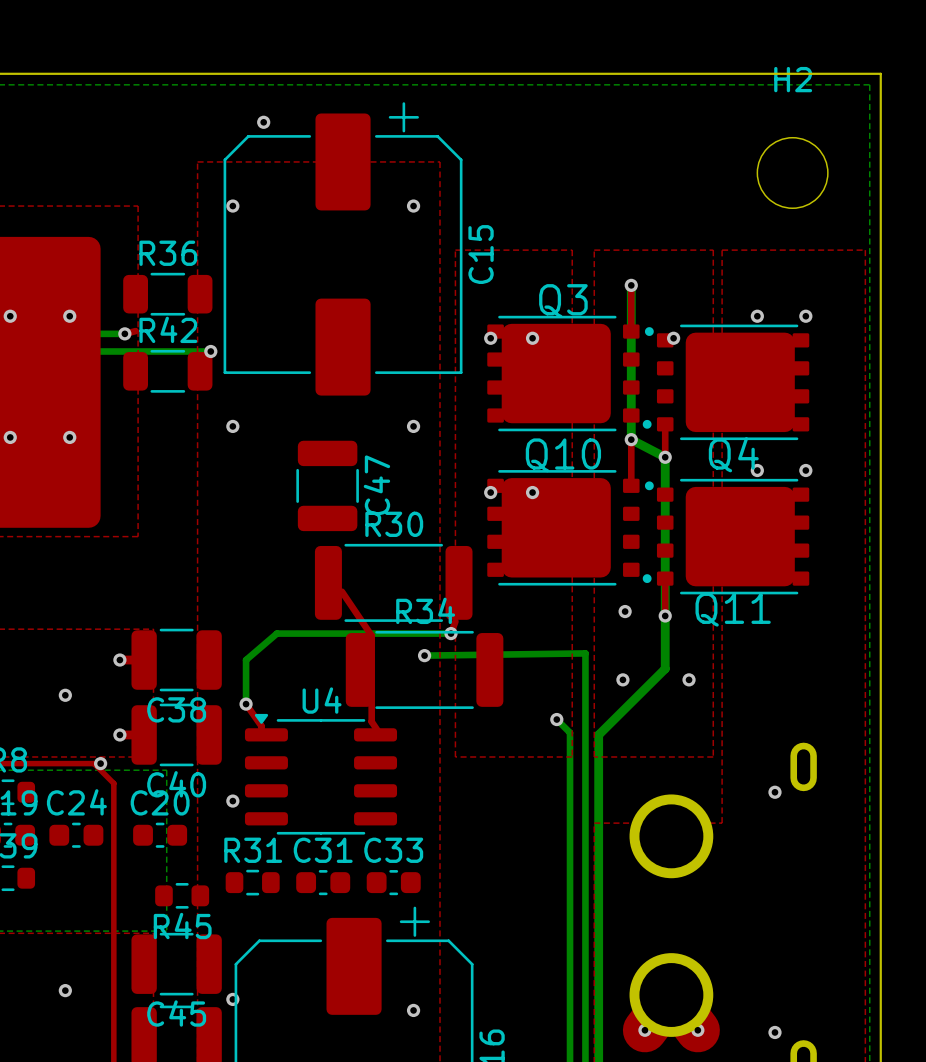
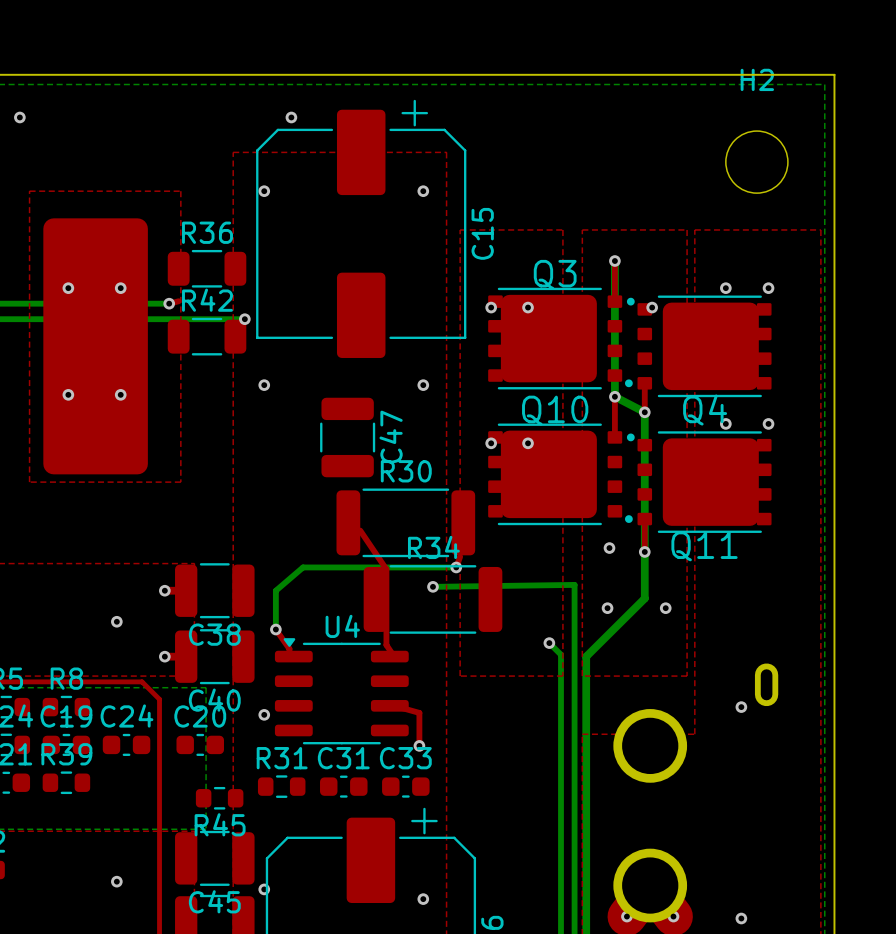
via: (100, 763) -> none
top track: none -> (394, 705) (419, 712) (419, 745)
via: none -> (419, 745)

